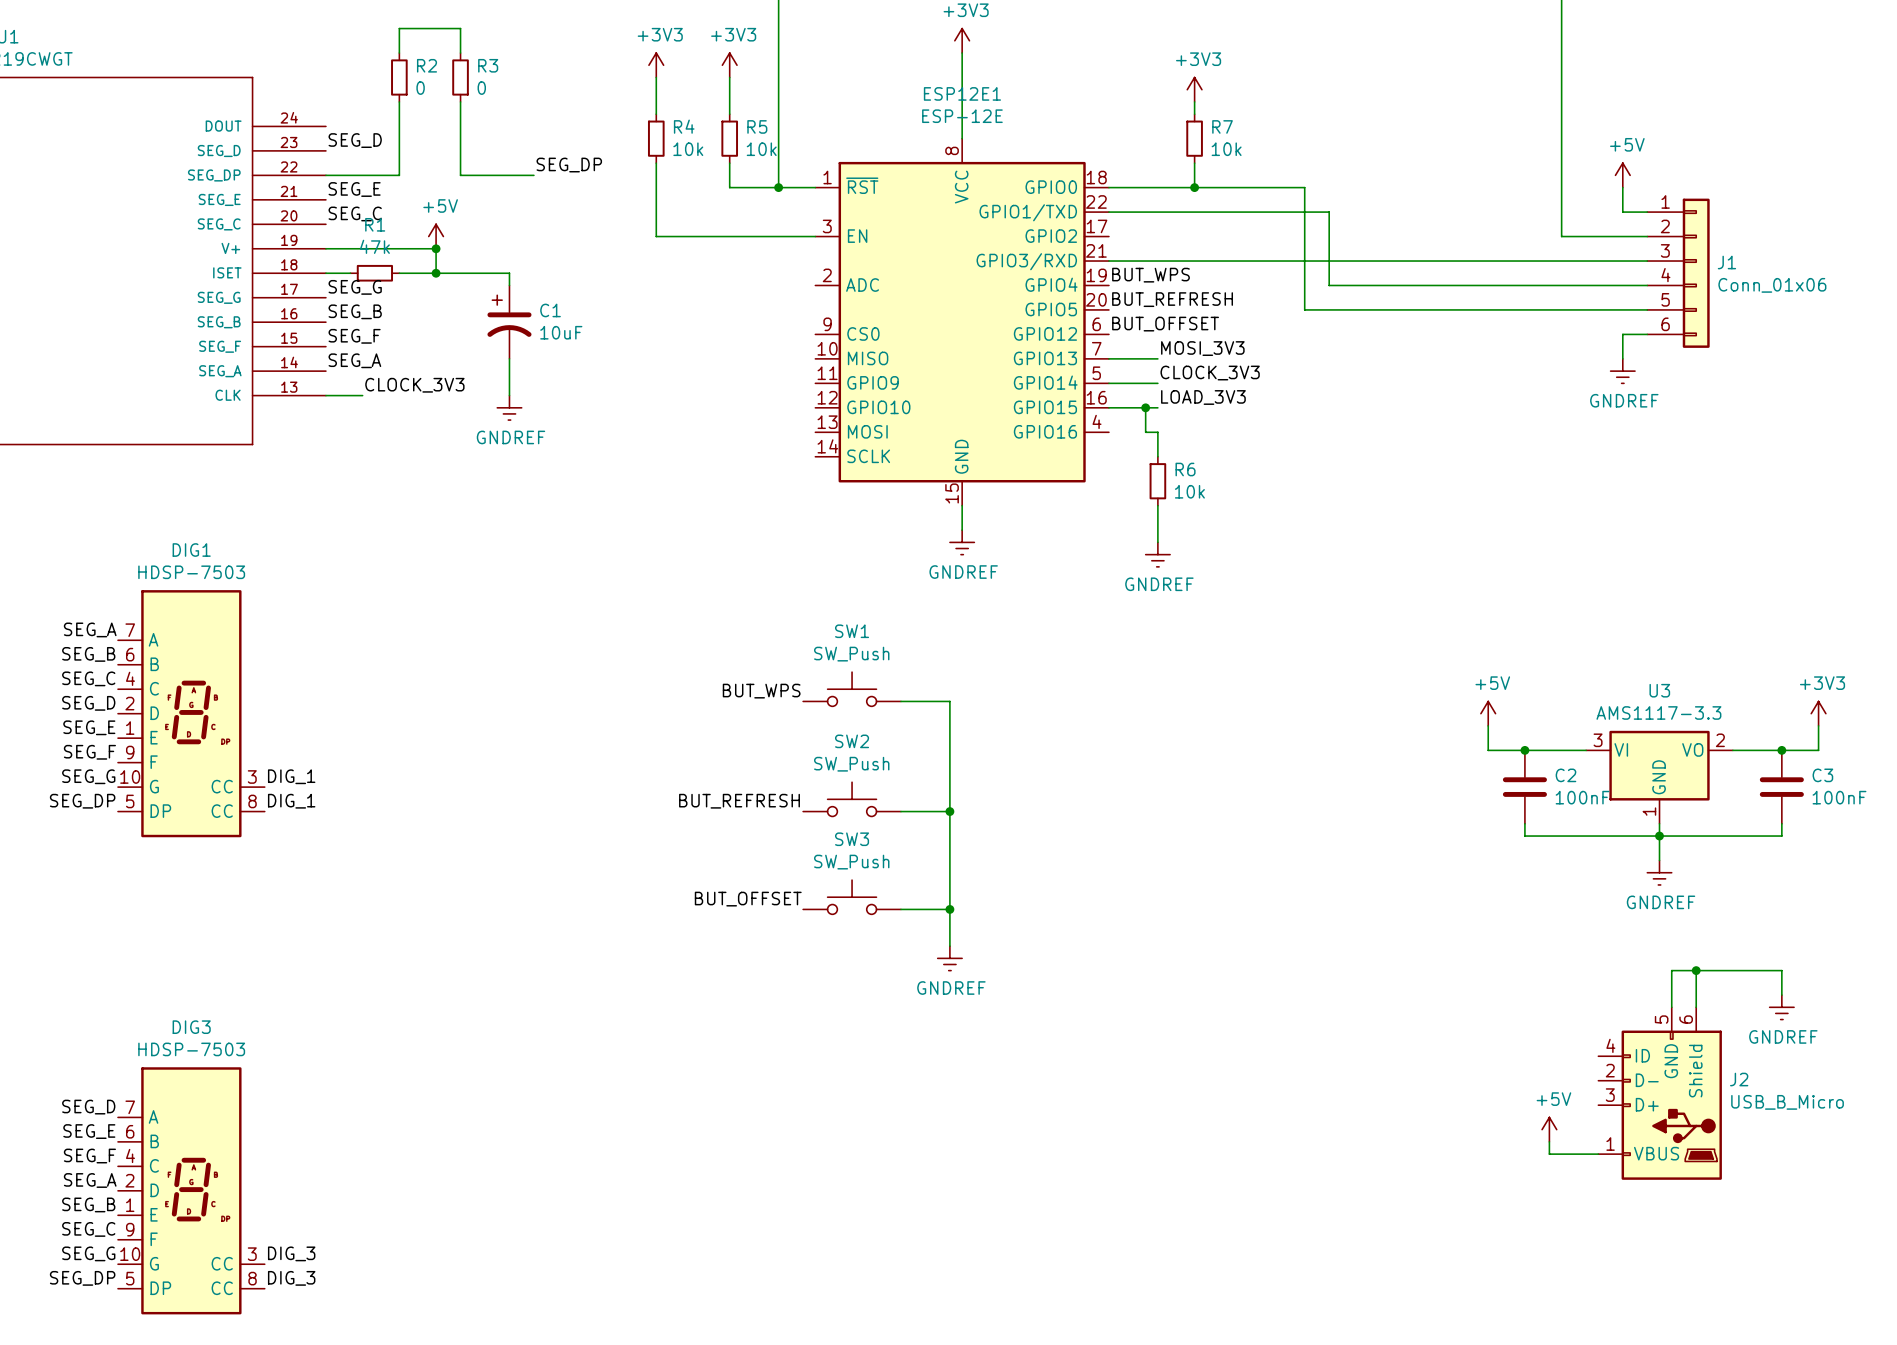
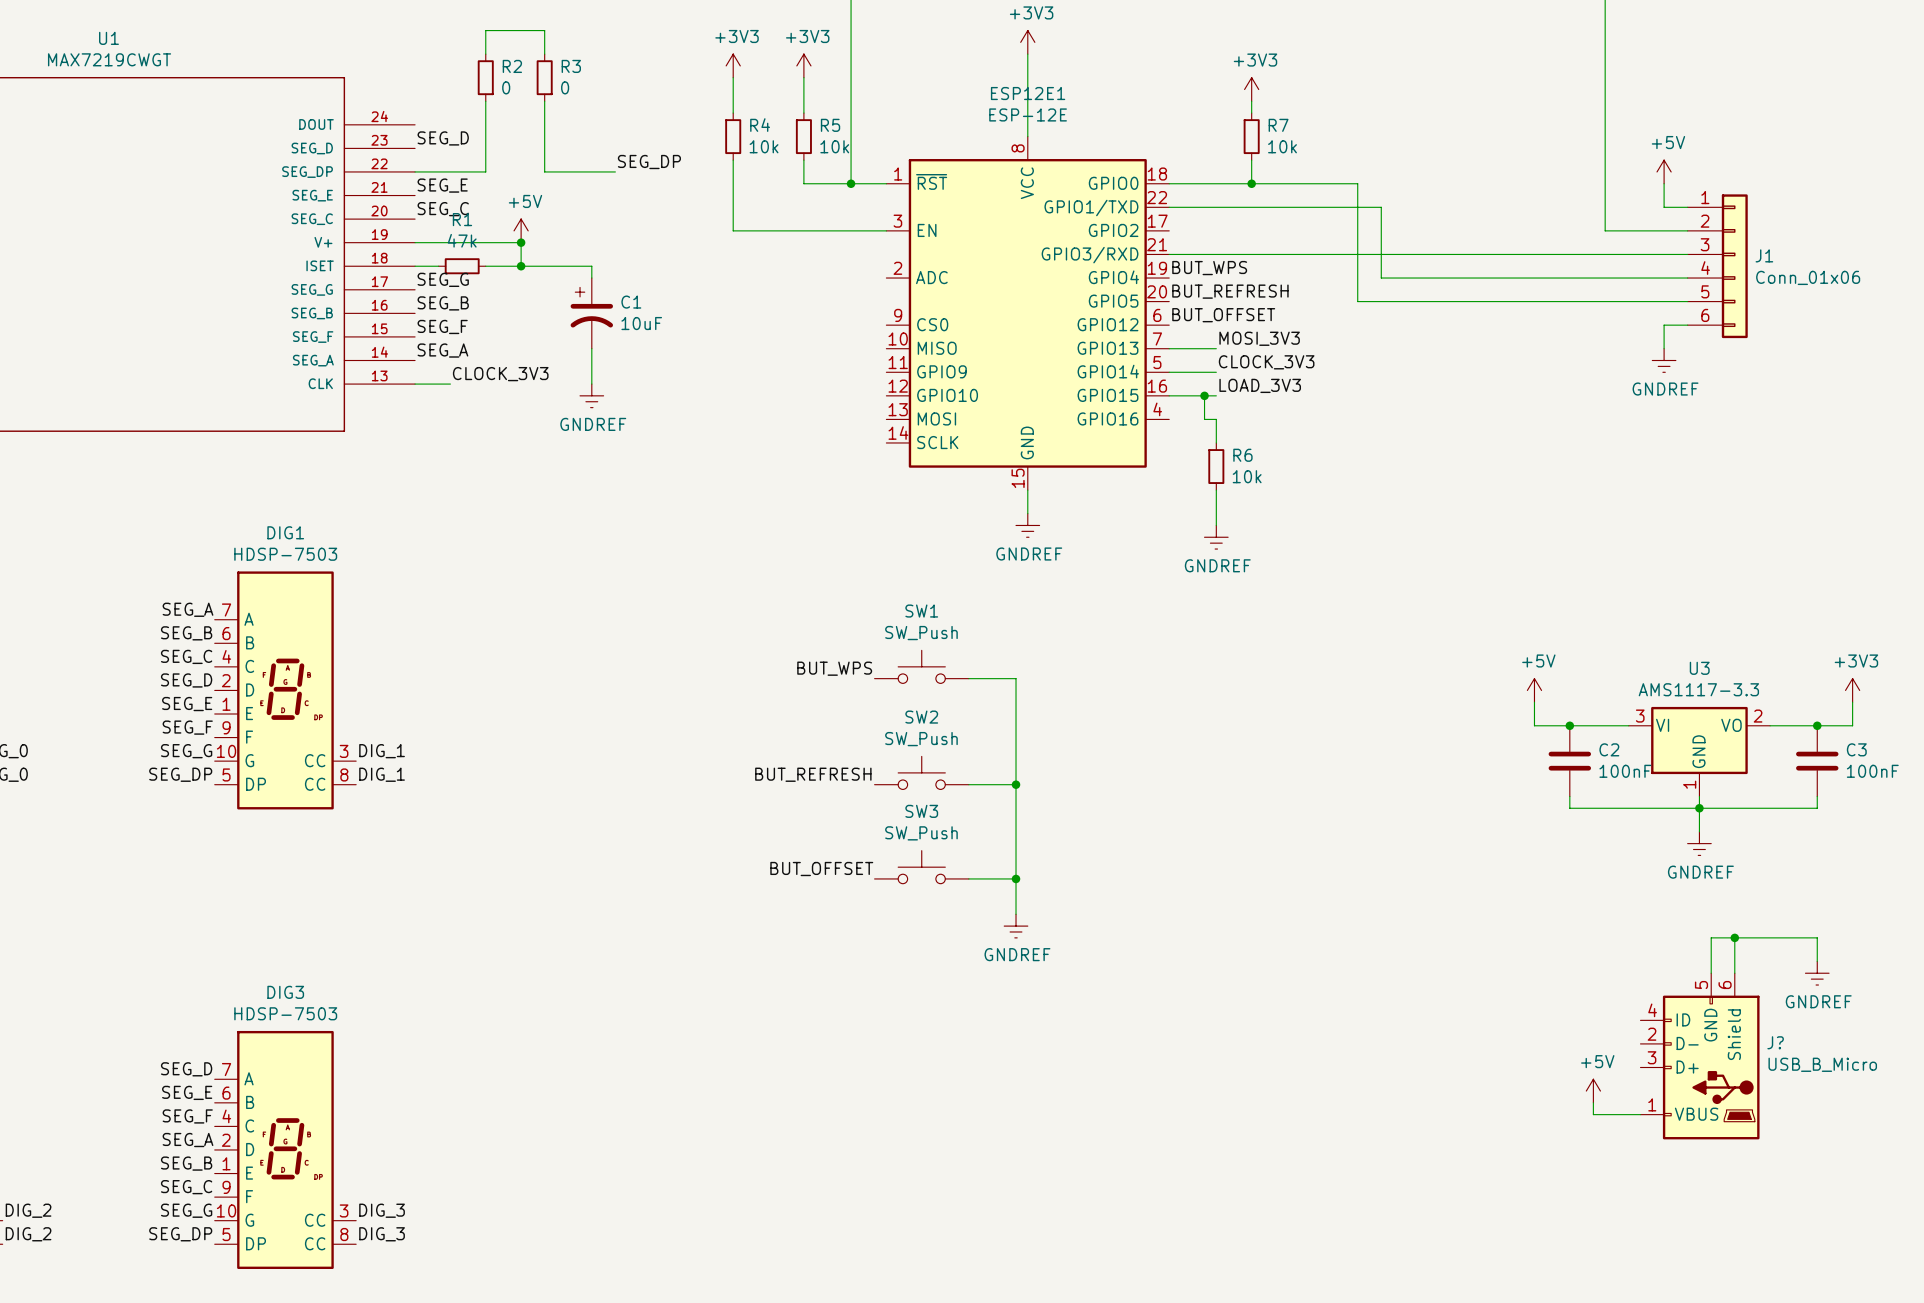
J2 name: J2 (1739, 1079) -> J? (1775, 1042)

